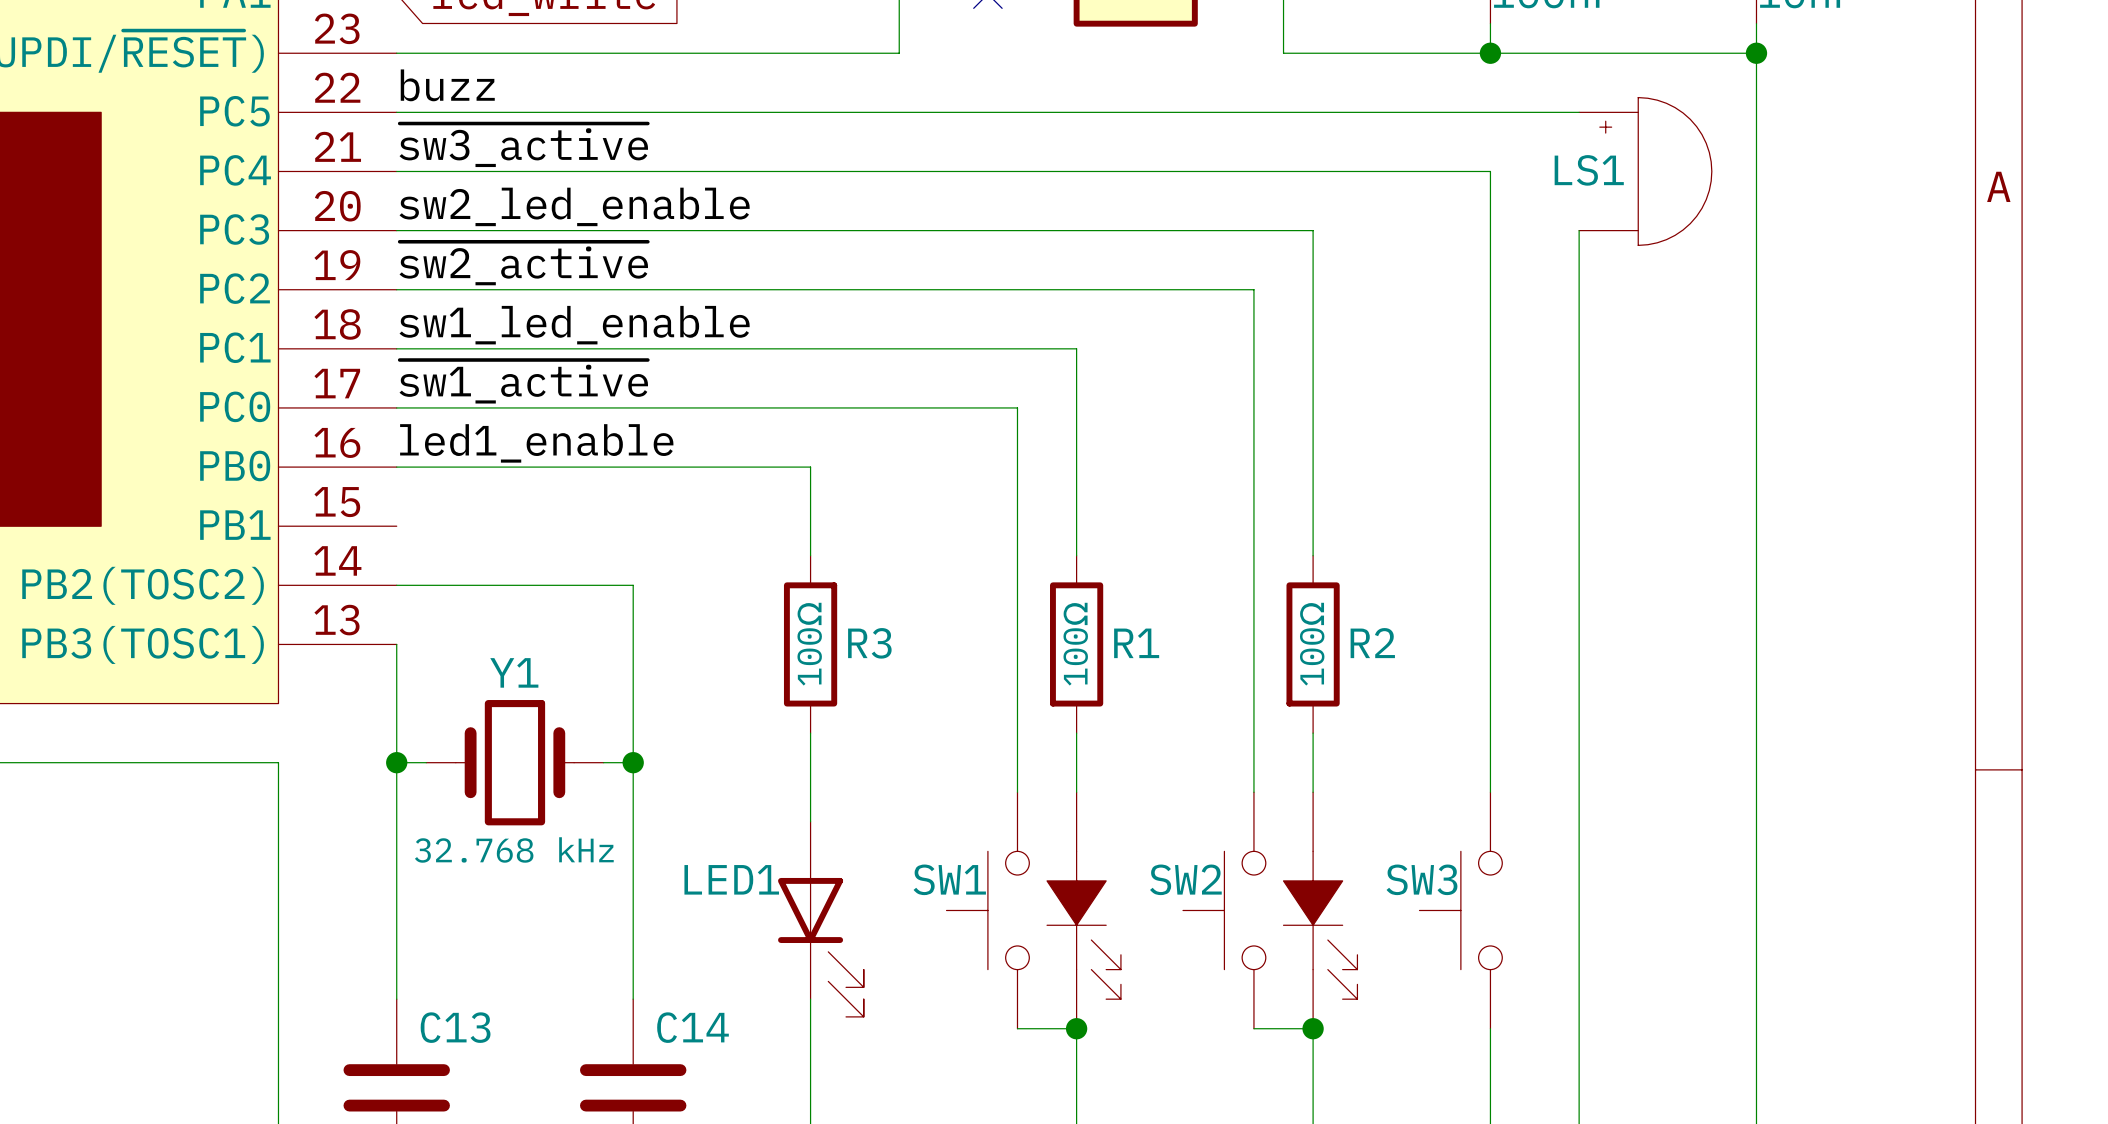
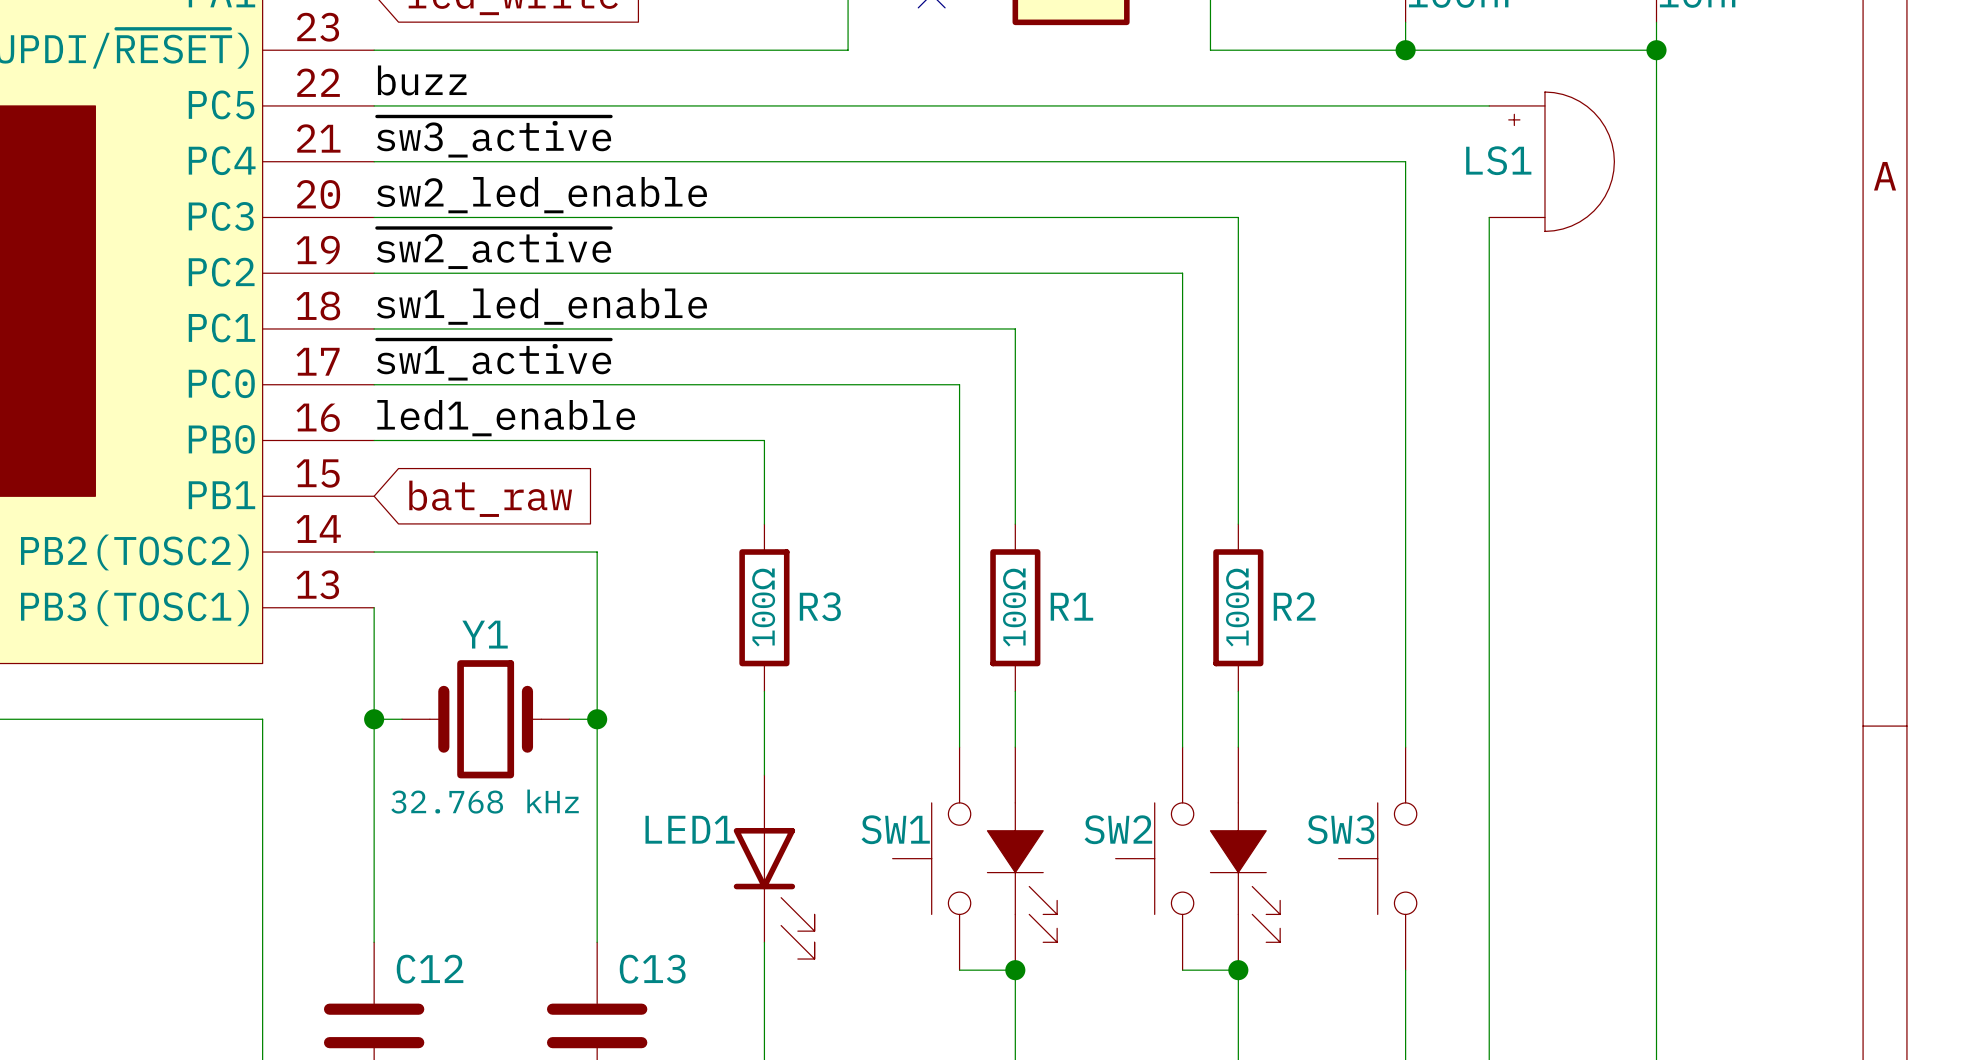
global label: none -> bat_raw (490, 498)
C13 name: C13 (455, 1027) -> C12 (430, 969)
C14 name: C14 (693, 1027) -> C13 (652, 969)

